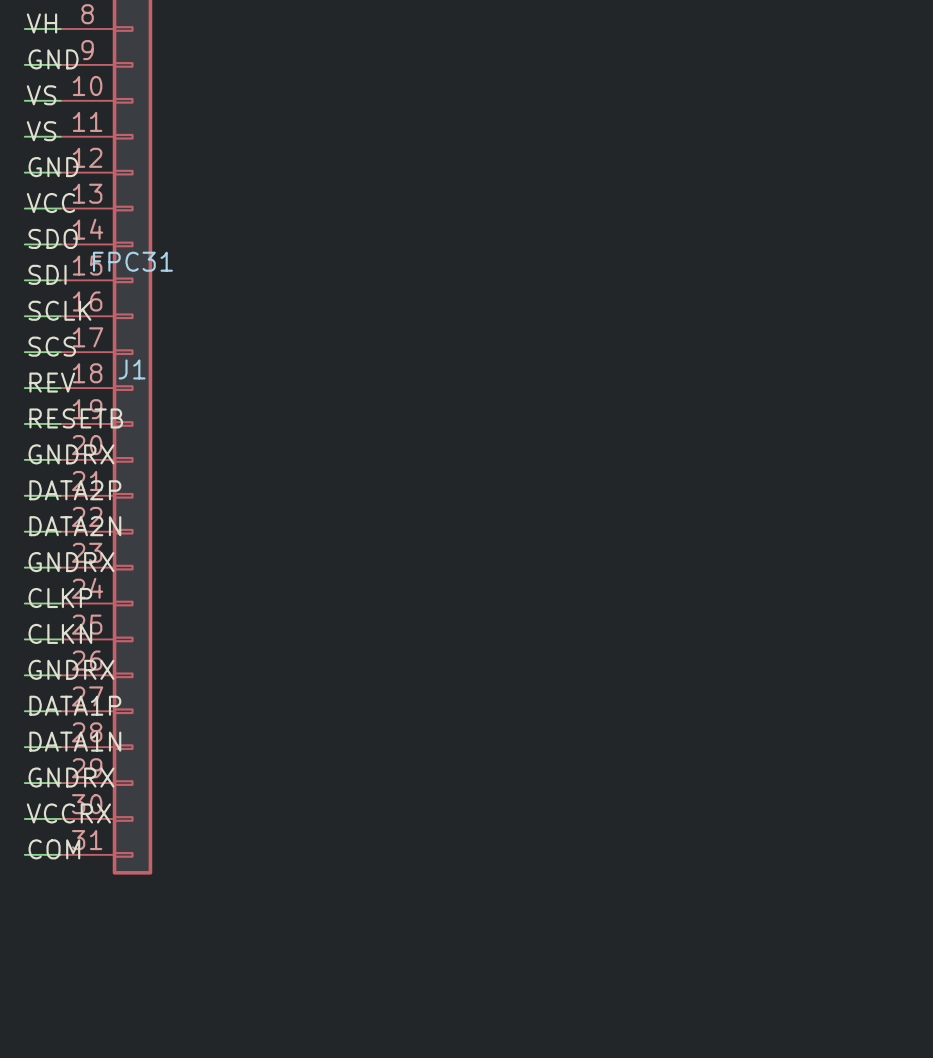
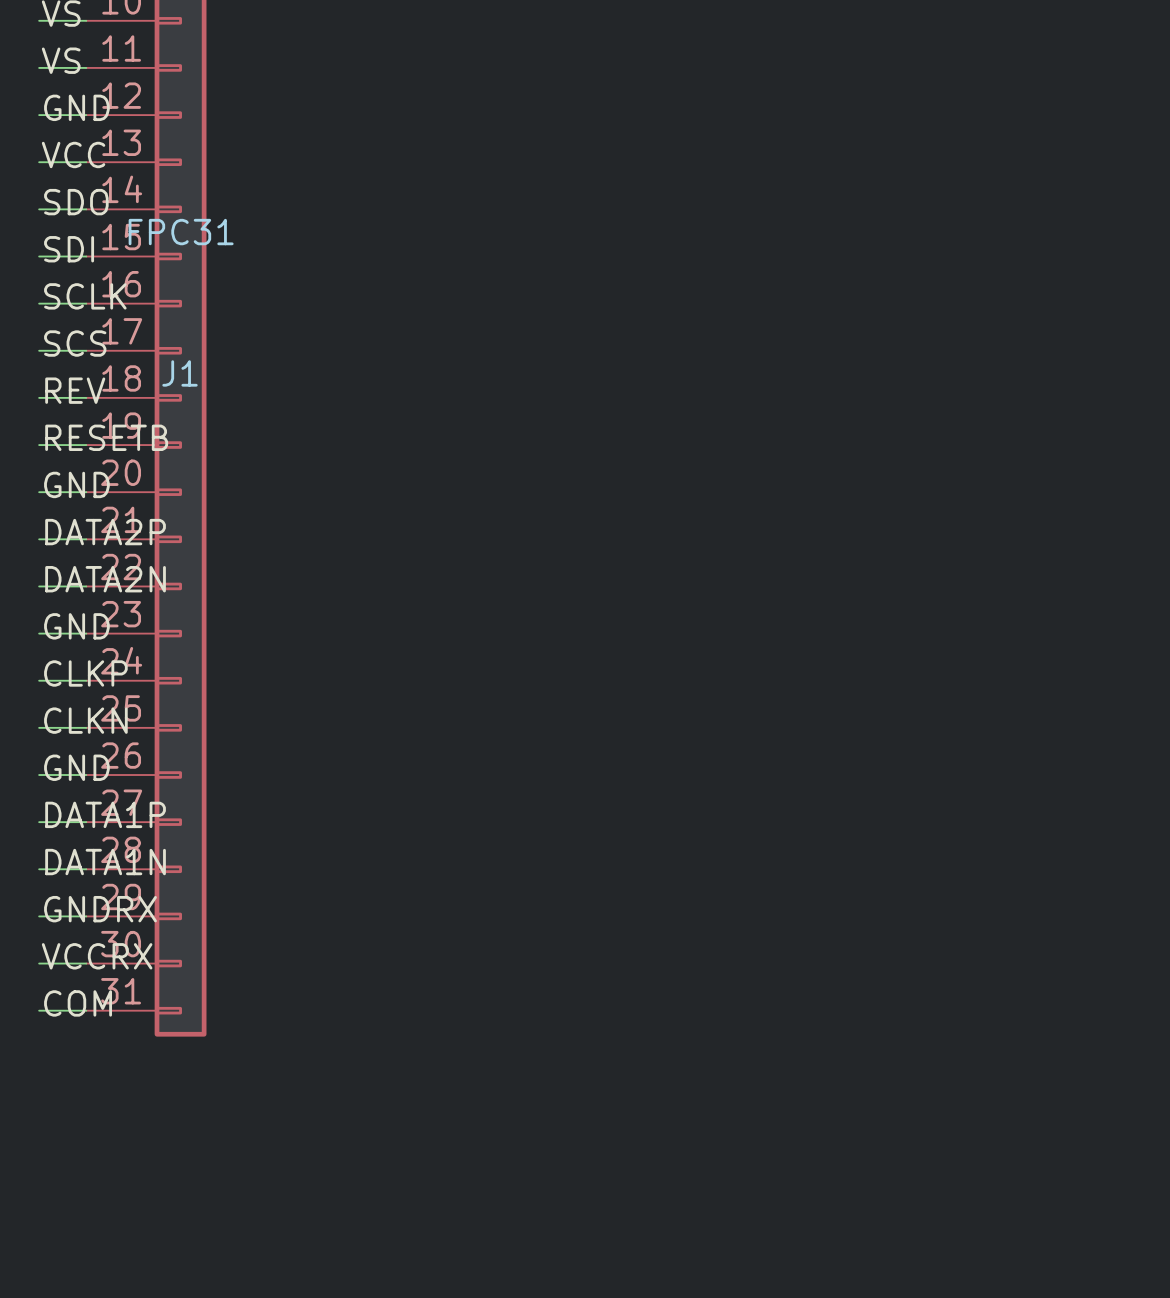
label: GNDRX (71, 454) -> GND (76, 484)
label: GNDRX (71, 562) -> GND (76, 626)
label: GNDRX (71, 669) -> GND (76, 767)

